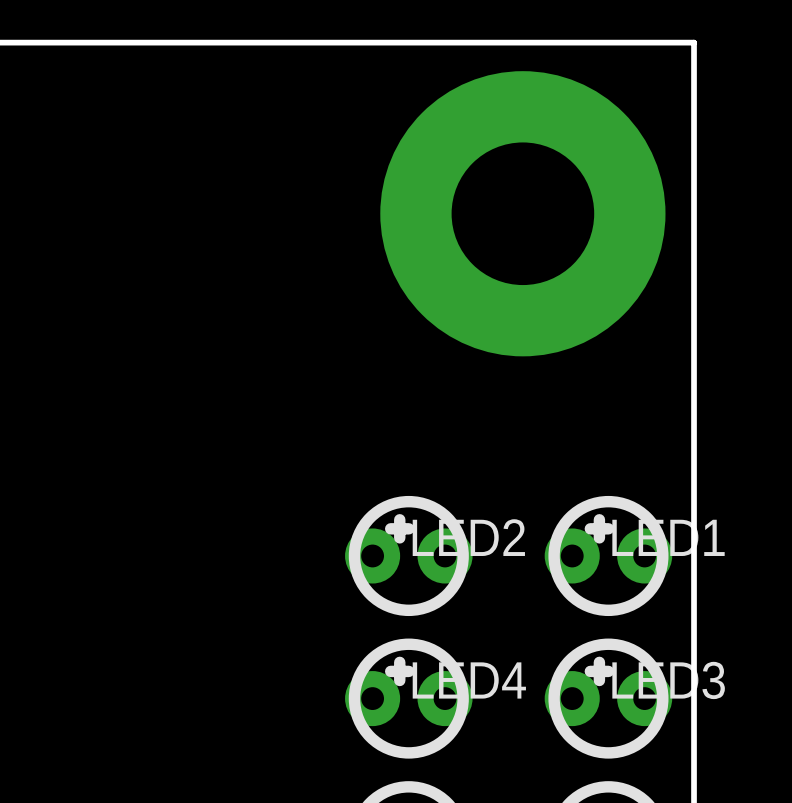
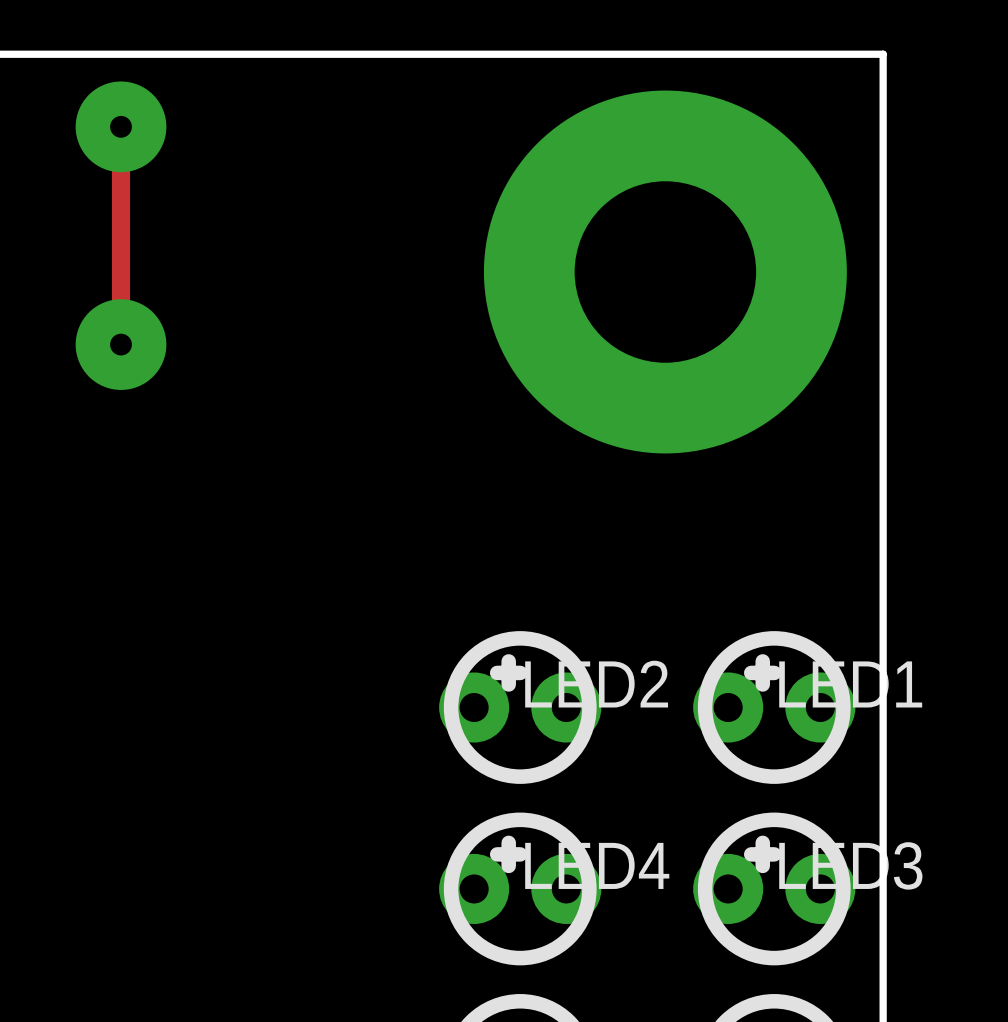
track: none -> (121, 126) (121, 344)
via: none -> (121, 126)
via: none -> (121, 344)

